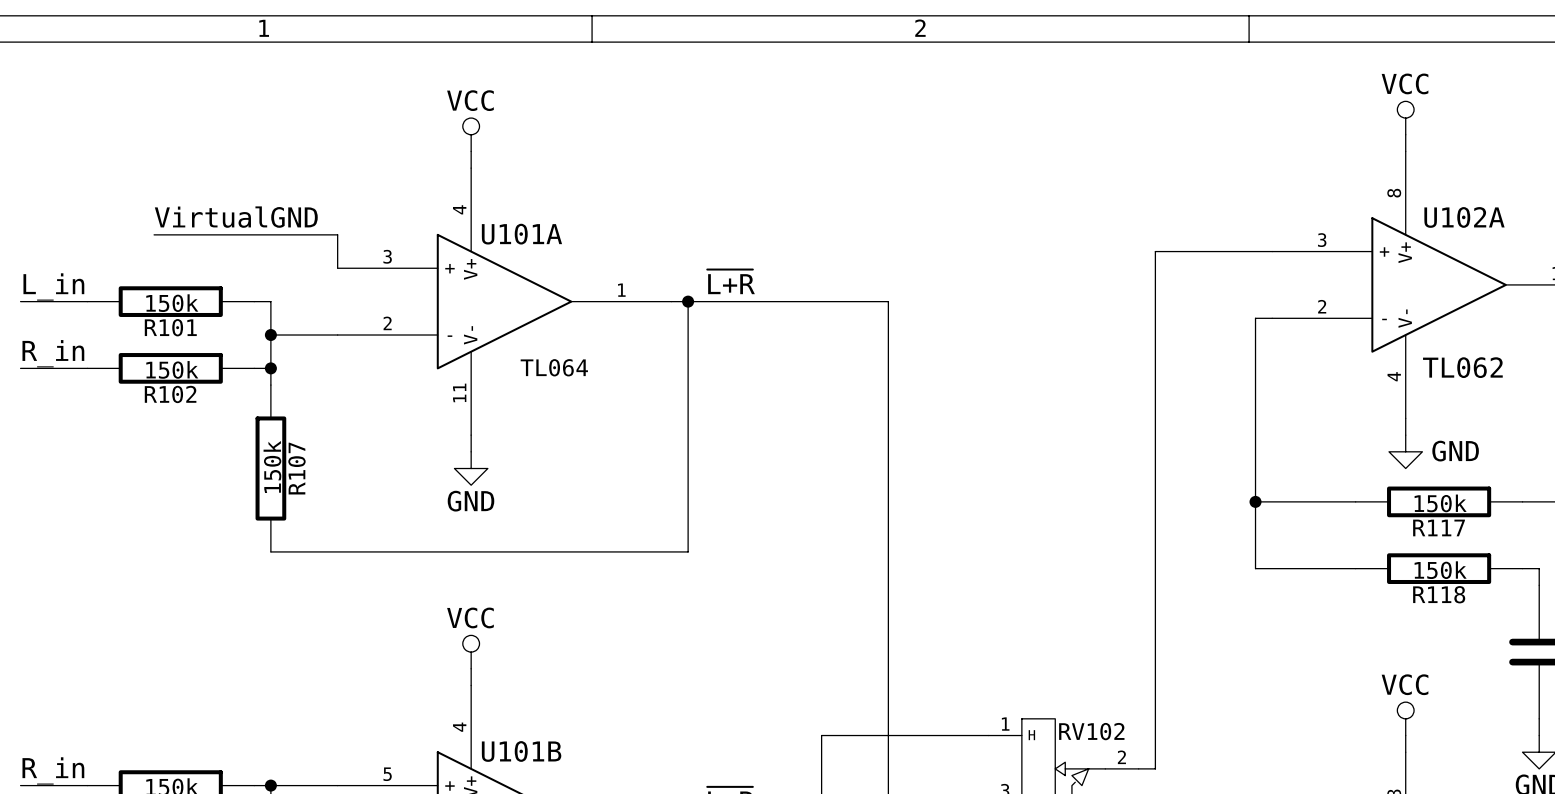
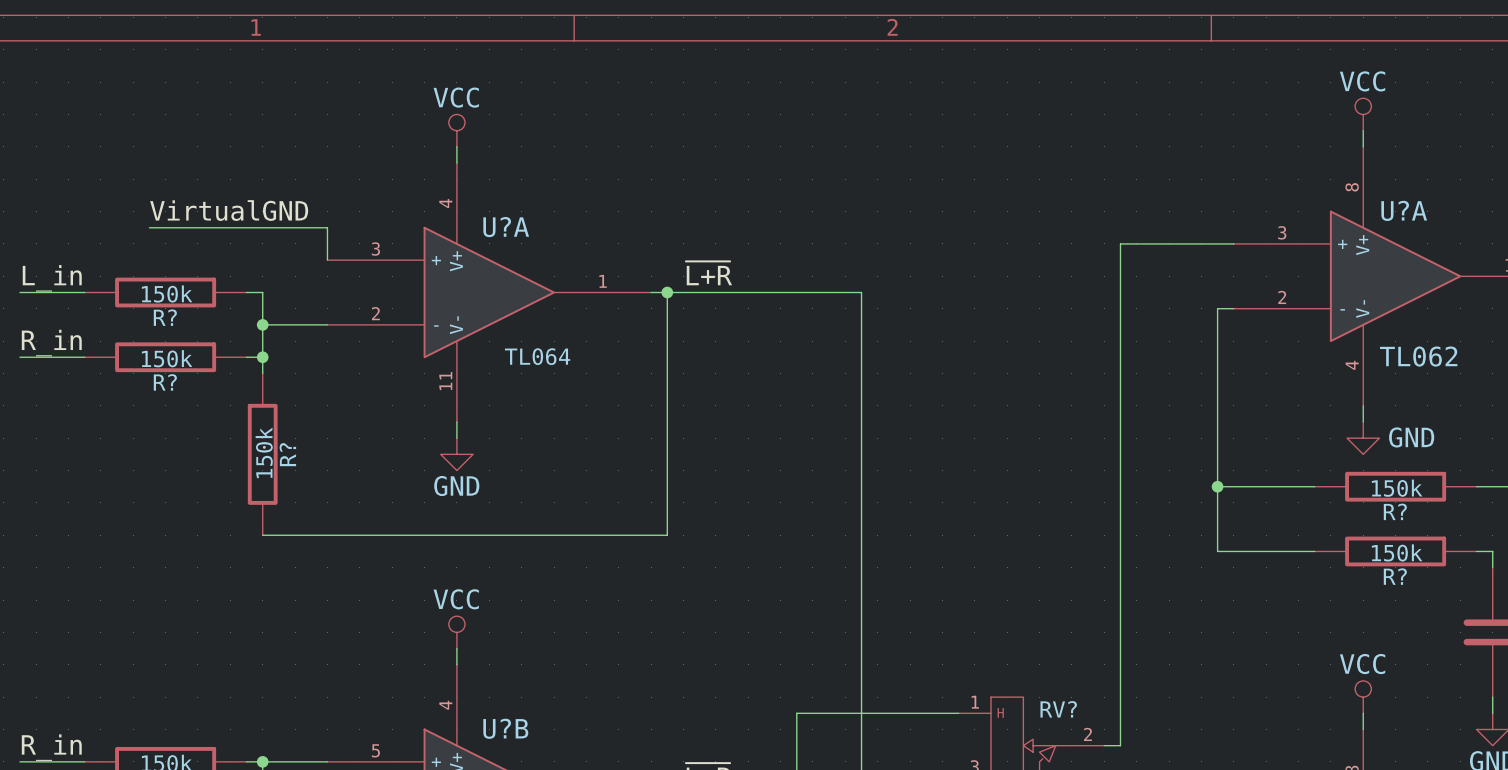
U102A name: U102A (1464, 217) -> U?A (1404, 210)
U101A name: U101A (521, 234) -> U?A (506, 227)
R101 name: R101 (170, 327) -> R? (165, 317)
R102 name: R102 (170, 394) -> R? (165, 382)
R107 name: R107 (296, 468) -> R? (287, 454)
R117 name: R117 (1439, 527) -> R? (1395, 511)
R118 name: R118 (1439, 594) -> R? (1395, 576)
RV102 name: RV102 (1091, 731) -> RV? (1058, 709)
U101B name: U101B (521, 751) -> U?B (505, 728)

